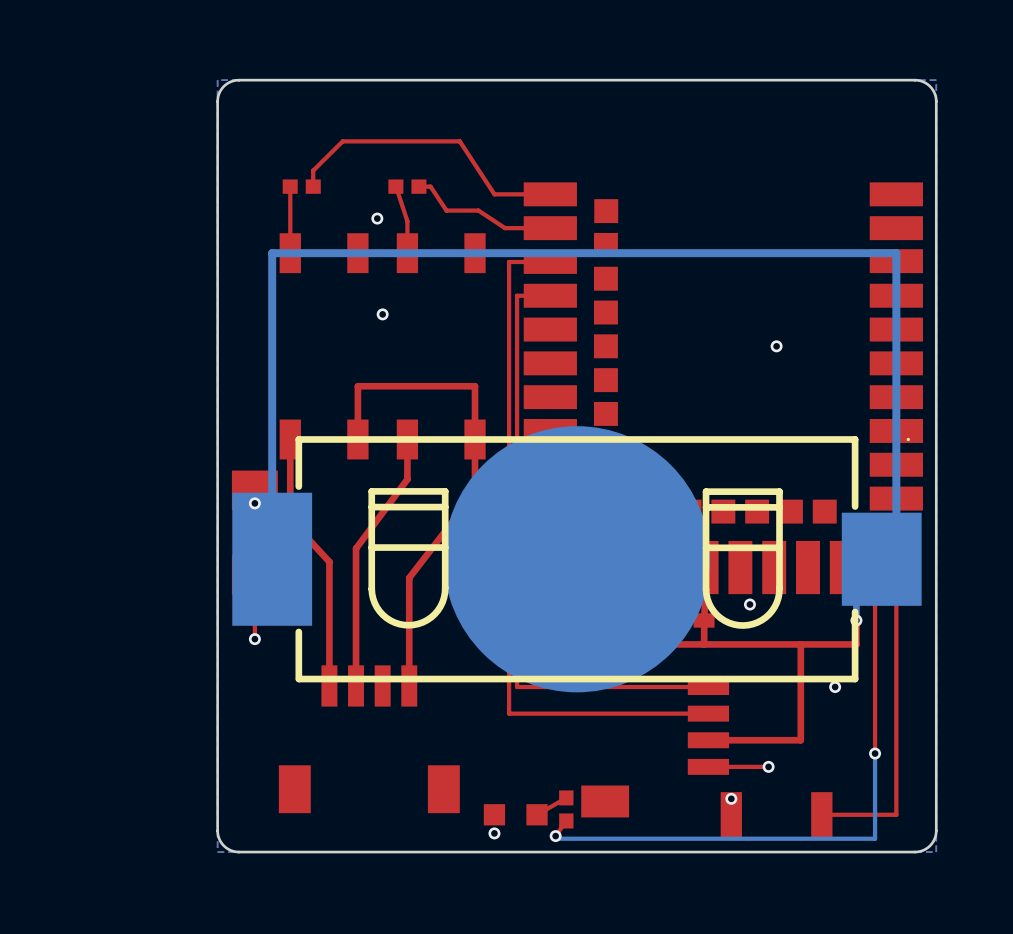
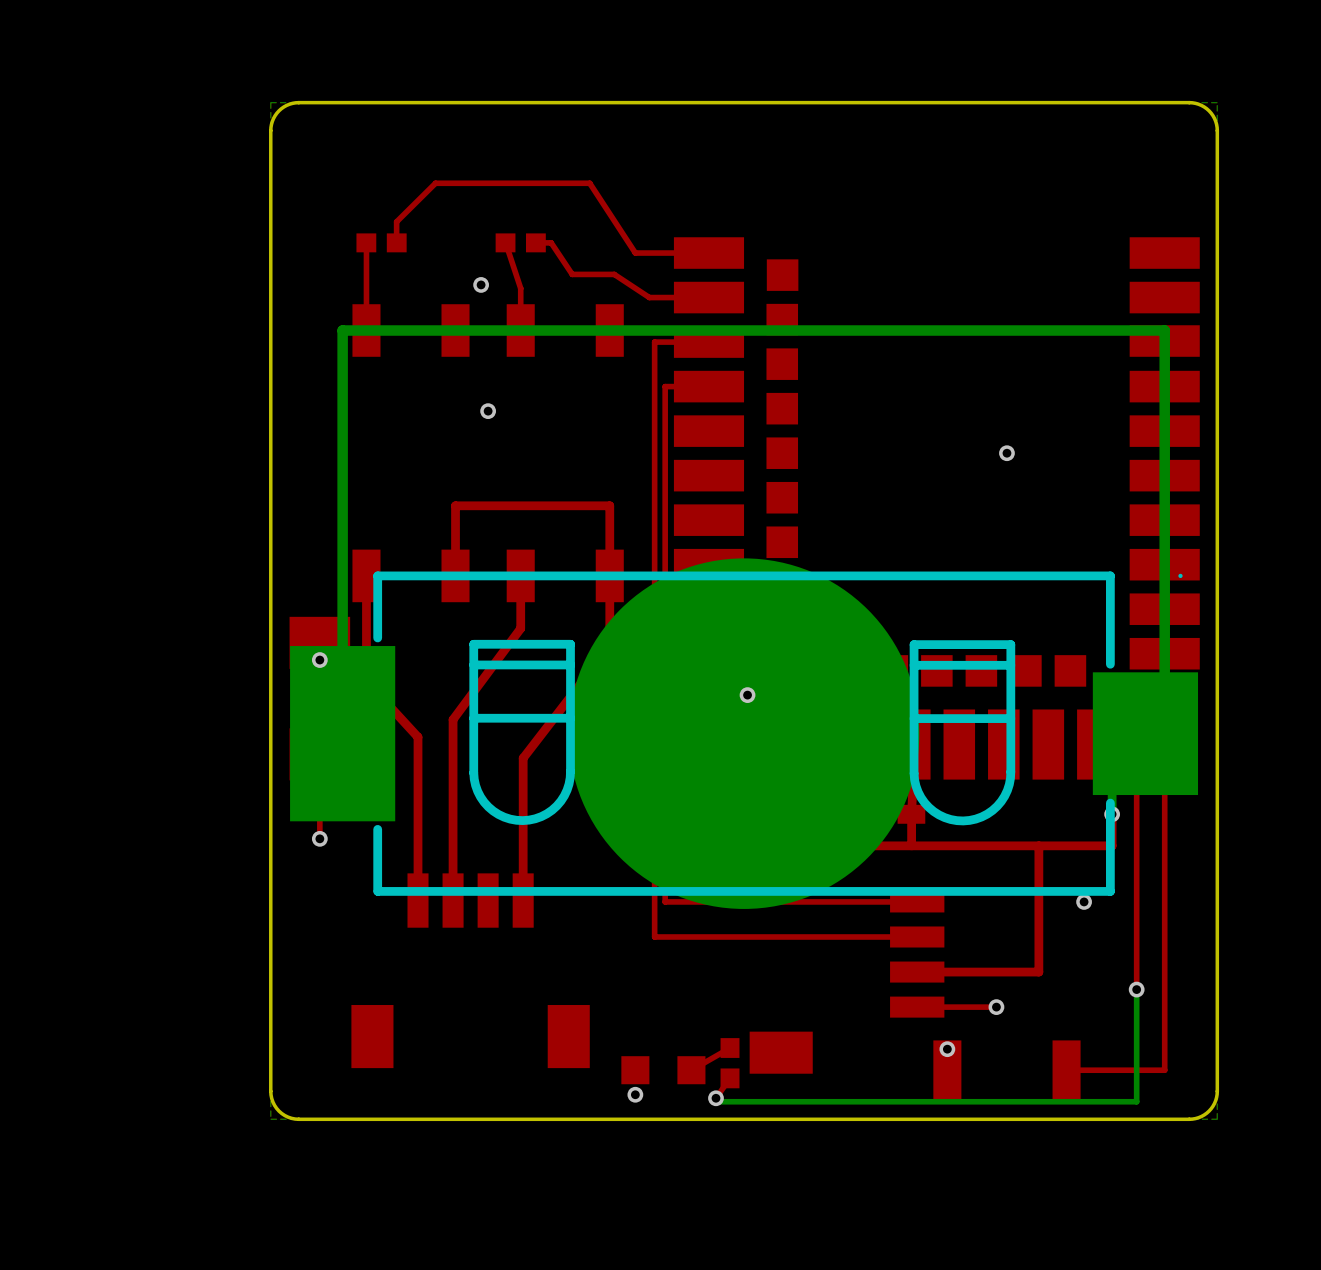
via: none -> (747, 695)
via: (749, 604) -> none

